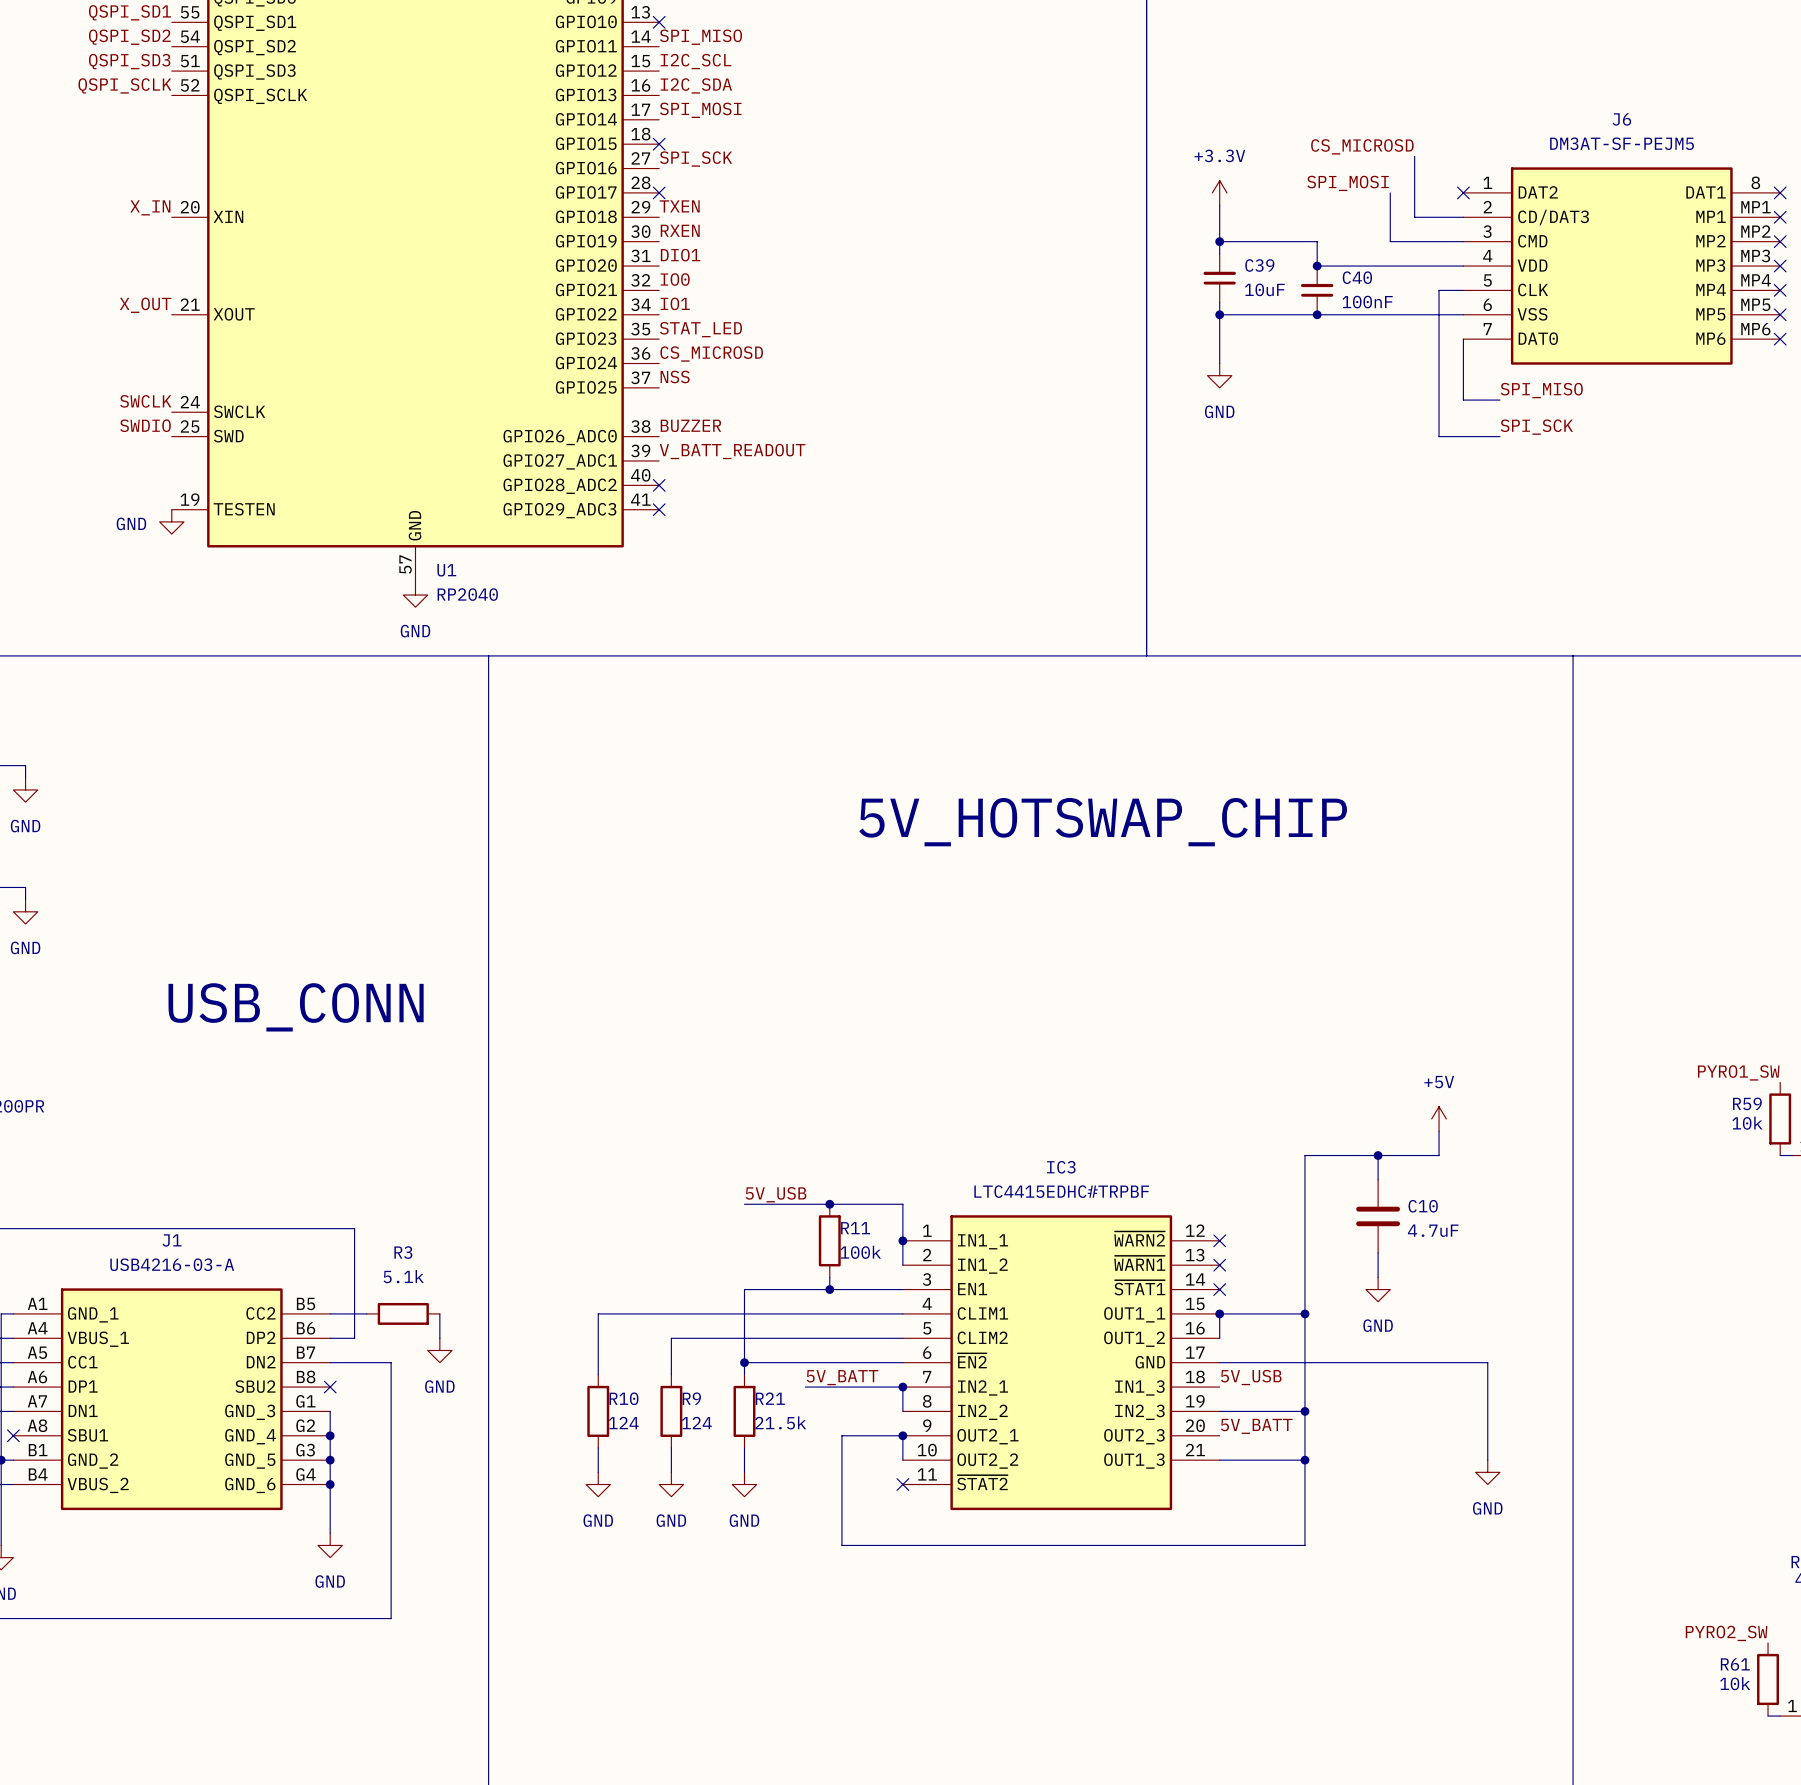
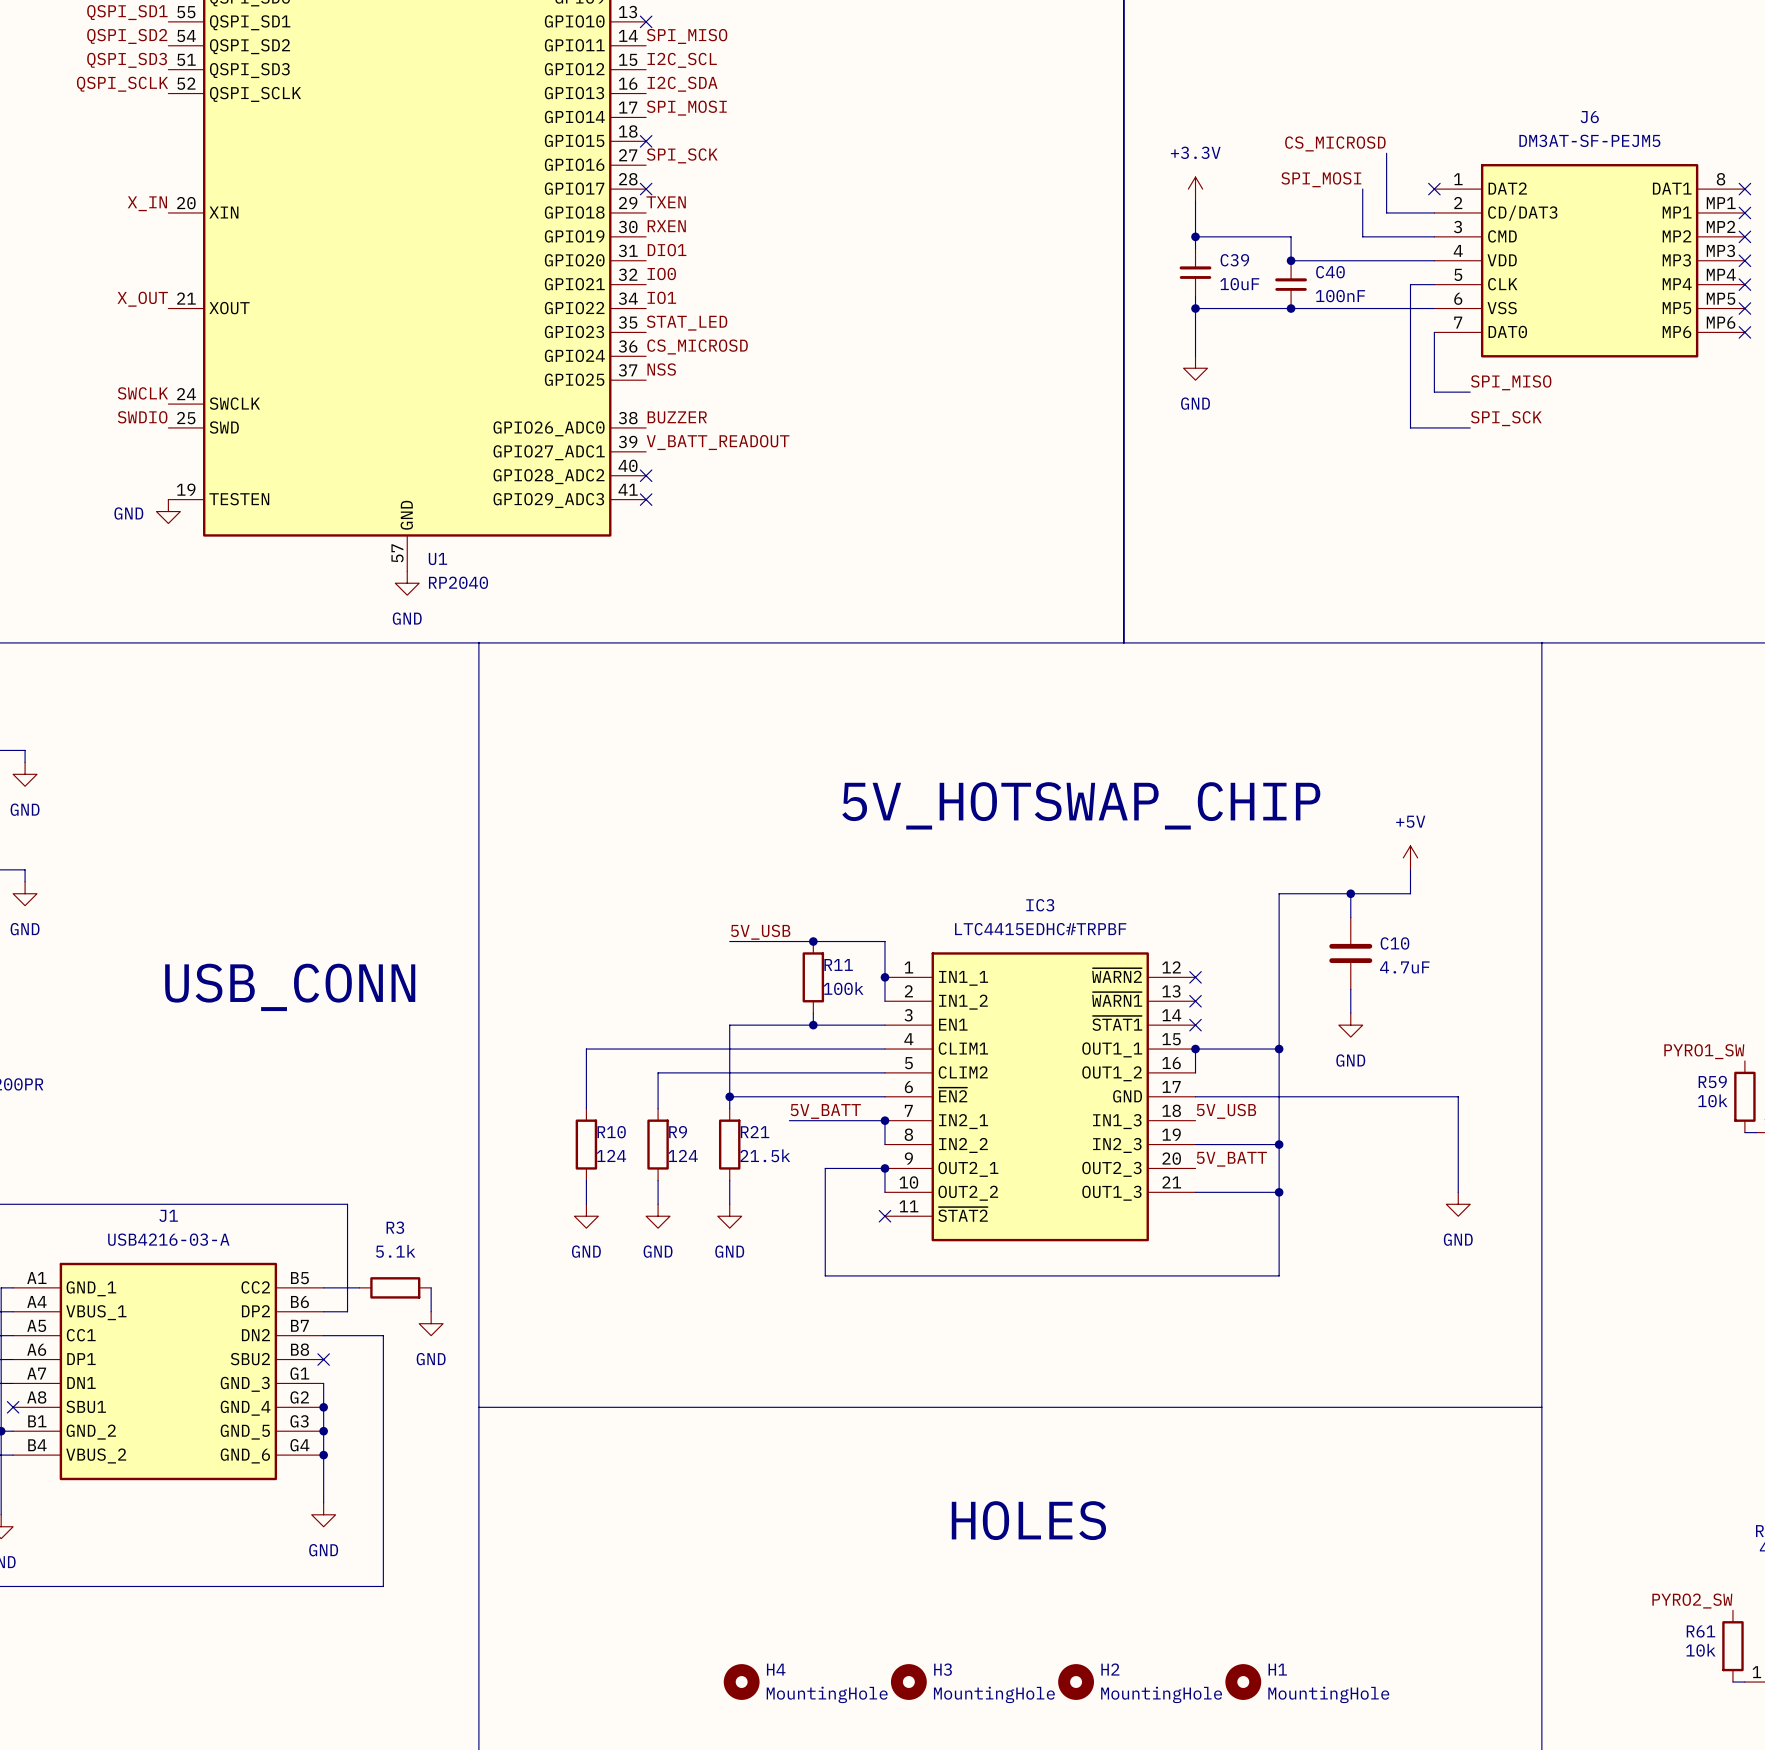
power symbol: none -> +5V (1410, 857)
wire: none -> (1350, 893) (1350, 917)
junction: none -> (1350, 893)
label: none -> 5V_USB (760, 932)
wire: none -> (729, 941) (884, 941) (884, 1001)
junction: none -> (813, 941)
junction: none -> (884, 977)
no-connect mark: none -> (1195, 977)
no-connect mark: none -> (1195, 1001)
wire: none -> (813, 1013) (813, 1025)
junction: none -> (813, 1025)
wire: none -> (884, 1025) (729, 1025) (729, 1108)
no-connect mark: none -> (1195, 1025)
power symbol: none -> GND (1350, 1025)
wire: none -> (884, 1049) (586, 1049) (586, 1108)
junction: none -> (1195, 1049)
wire: none -> (1279, 1049) (1195, 1049) (1195, 1072)
junction: none -> (1279, 1049)
wire: none -> (884, 1072) (658, 1072) (658, 1108)
wire: none -> (729, 1096) (884, 1096)
junction: none -> (729, 1096)
wire: none -> (1195, 1096) (1458, 1096) (1458, 1192)
power symbol: +5V (1439, 1118) -> none
wire: (1439, 1131) (1439, 1155) (1304, 1155) -> (1410, 869) (1410, 893) (1279, 893) (1279, 1132)
label: none -> 5V_BATT (825, 1111)
label: none -> 5V_USB (1226, 1111)
wire: none -> (789, 1120) (884, 1120) (884, 1144)
junction: none -> (884, 1120)
wire: (1378, 1155) (1378, 1179) -> (1350, 989) (1350, 1013)
junction: (1378, 1155) -> none
wire: none -> (1195, 1144) (1279, 1144)
junction: none -> (1279, 1144)
label: none -> 5V_BATT (1231, 1159)
junction: none -> (884, 1168)
label: 5V_USB (776, 1194) -> none
wire: none -> (586, 1180) (586, 1204)
wire: none -> (658, 1180) (658, 1204)
wire: (744, 1204) (902, 1204) -> (729, 1180) (729, 1204)
junction: (829, 1204) -> none
wire: (902, 1216) (902, 1265) -> none
junction: none -> (1279, 1192)
C10 position: (1378, 1216) -> (1350, 953)
power symbol: none -> GND (1458, 1204)
power symbol: none -> GND (586, 1216)
power symbol: none -> GND (658, 1216)
power symbol: none -> GND (729, 1216)
R11 position: (829, 1240) -> (813, 977)
junction: (902, 1240) -> none
no-connect mark: none -> (884, 1216)
no-connect mark: (1219, 1240) -> none
wire: (1378, 1253) (1378, 1277) -> none
no-connect mark: (1219, 1265) -> none
wire: (829, 1277) (829, 1289) -> none
junction: (829, 1289) -> none
wire: (902, 1289) (744, 1289) (744, 1374) -> none
no-connect mark: (1219, 1289) -> none
power symbol: GND (1378, 1289) -> none
wire: (1304, 1301) (1304, 1545) (841, 1545) (841, 1435) (902, 1435) (902, 1460) -> (1279, 1275) (825, 1275) (825, 1168) (884, 1168) (884, 1180)
wire: (902, 1313) (598, 1313) (598, 1374) -> none
junction: (1219, 1313) -> none
wire: (1304, 1313) (1219, 1313) (1219, 1338) -> none
junction: (1304, 1313) -> none
wire: (902, 1338) (671, 1338) (671, 1374) -> none
wire: (744, 1362) (902, 1362) -> none
junction: (744, 1362) -> none
IC3 position: (1061, 1362) -> (1040, 1096)
wire: (1219, 1362) (1487, 1362) (1487, 1460) -> none
label: 5V_BATT (842, 1377) -> none
label: 5V_USB (1251, 1377) -> none
wire: (805, 1387) (902, 1387) (902, 1411) -> none
junction: (902, 1387) -> none
R10 position: (598, 1411) -> (586, 1144)
R9 position: (671, 1411) -> (658, 1144)
R21 position: (744, 1411) -> (729, 1144)
wire: (1219, 1411) (1304, 1411) -> (1195, 1192) (1279, 1192)
junction: (1304, 1411) -> none
label: 5V_BATT (1256, 1426) -> none
line: none -> (478, 1407) (1541, 1407)
junction: (902, 1435) -> none
wire: (598, 1447) (598, 1472) -> none
wire: (671, 1447) (671, 1472) -> none
wire: (744, 1447) (744, 1472) -> none
wire: (1219, 1460) (1304, 1460) -> none
junction: (1304, 1460) -> none
power symbol: GND (1487, 1472) -> none
power symbol: GND (598, 1484) -> none
power symbol: GND (671, 1484) -> none
power symbol: GND (744, 1484) -> none
no-connect mark: (902, 1484) -> none
text: none -> HOLES (1028, 1520)
H4: none -> MountingHole (741, 1682)
H3: none -> MountingHole (908, 1682)
H2: none -> MountingHole (1076, 1682)
H1: none -> MountingHole (1243, 1682)

